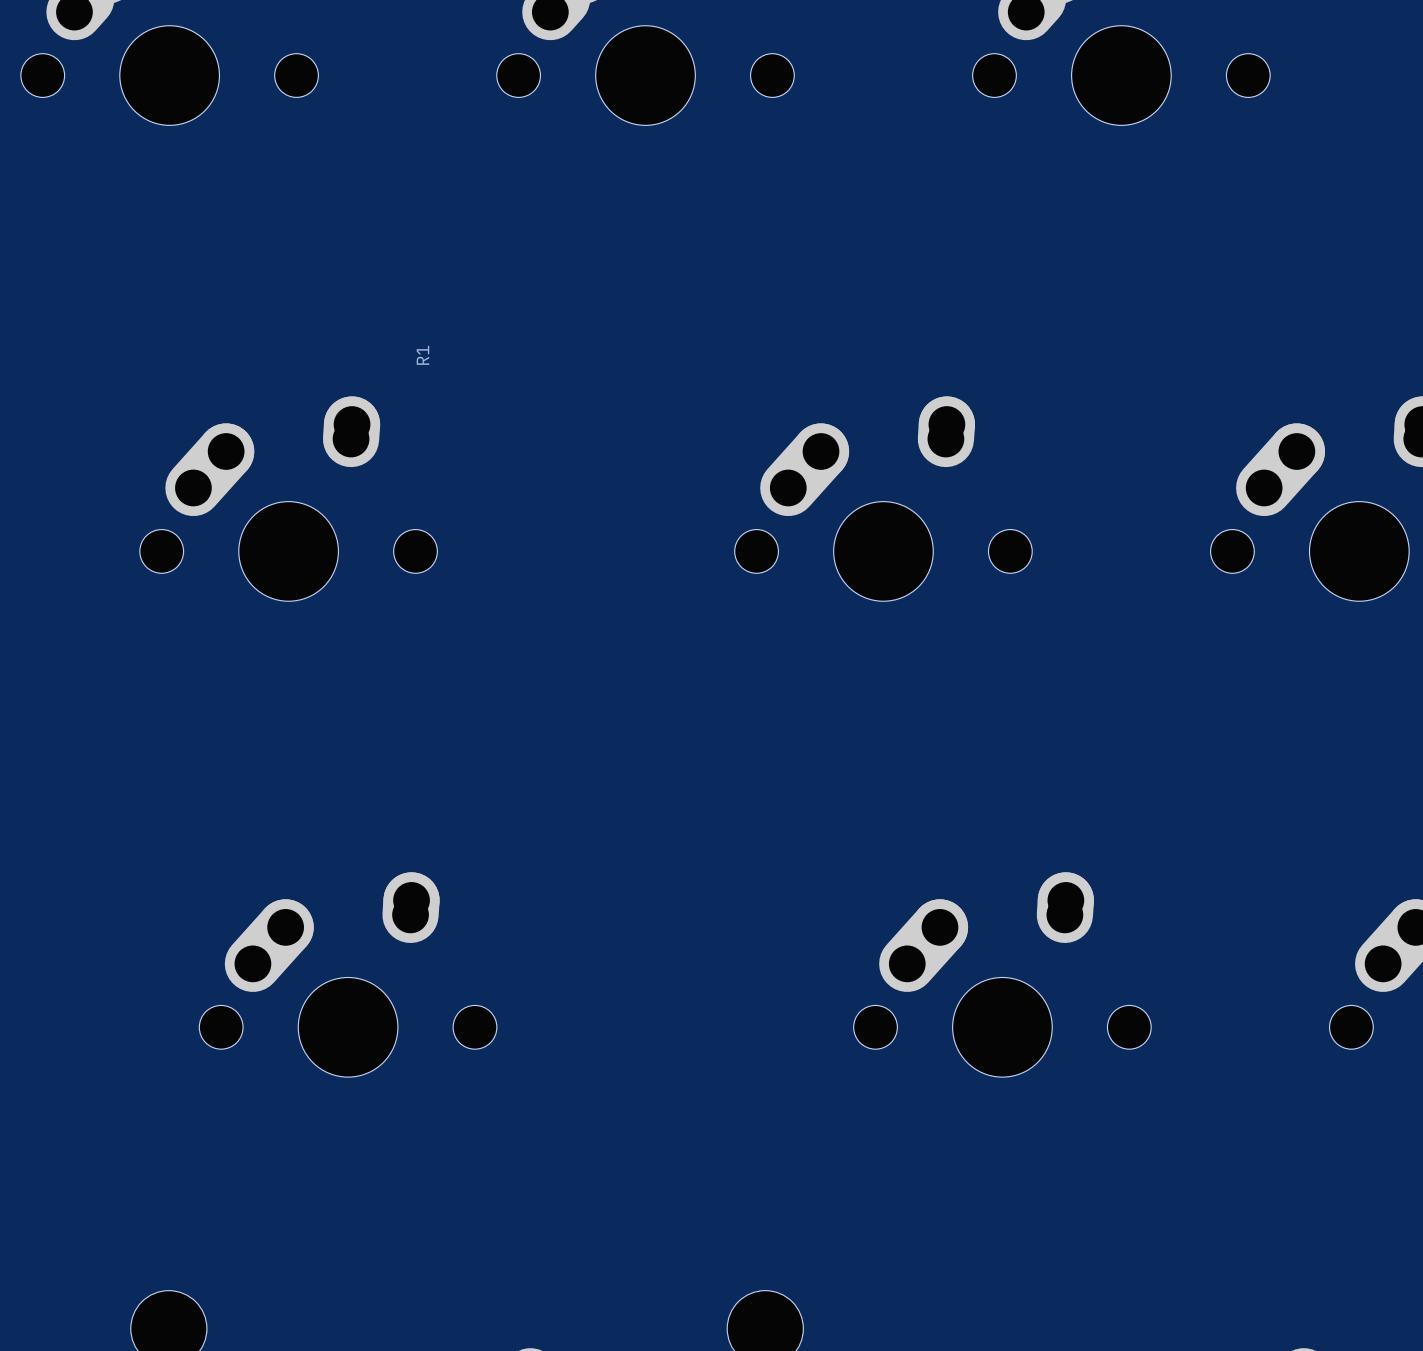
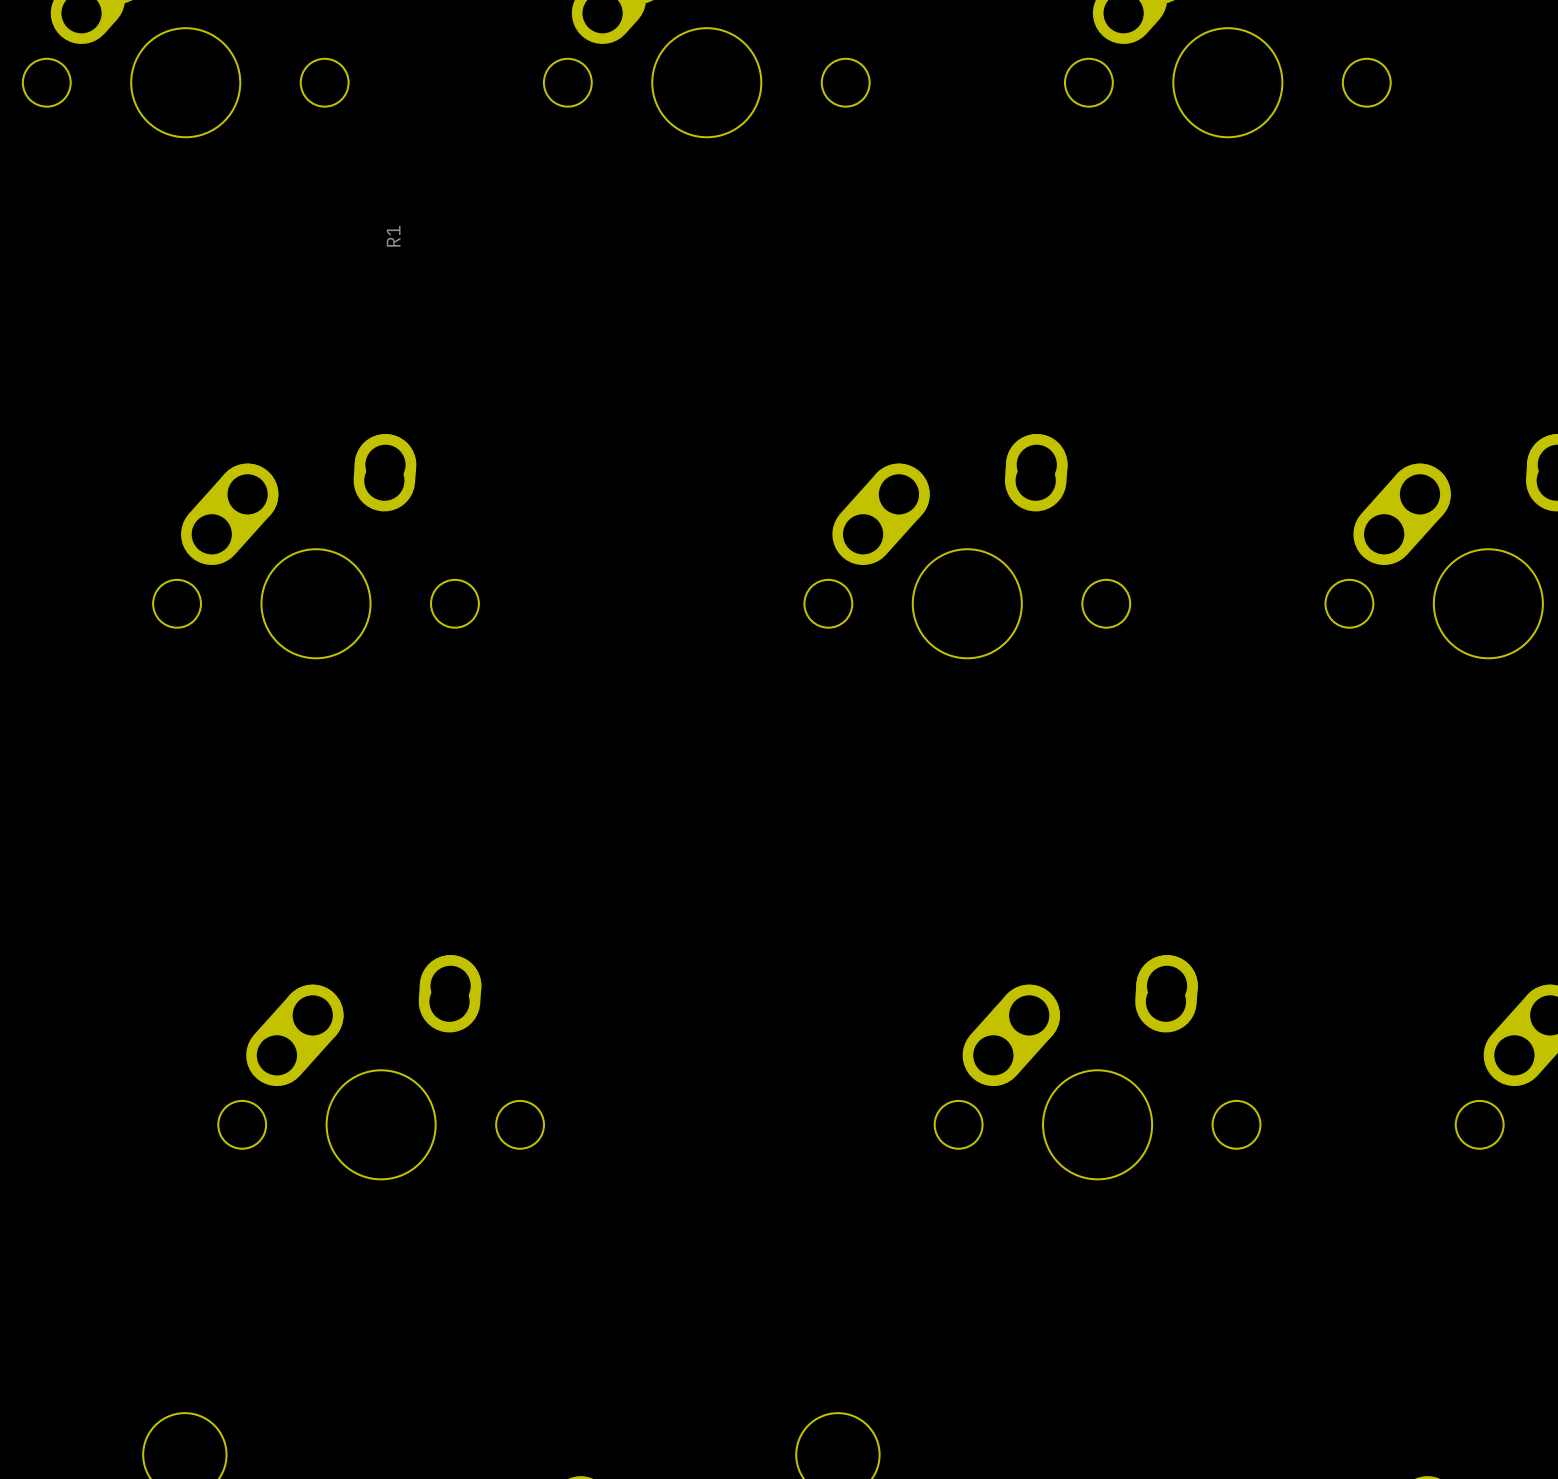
R1 position: (422, 355) -> (393, 236)

